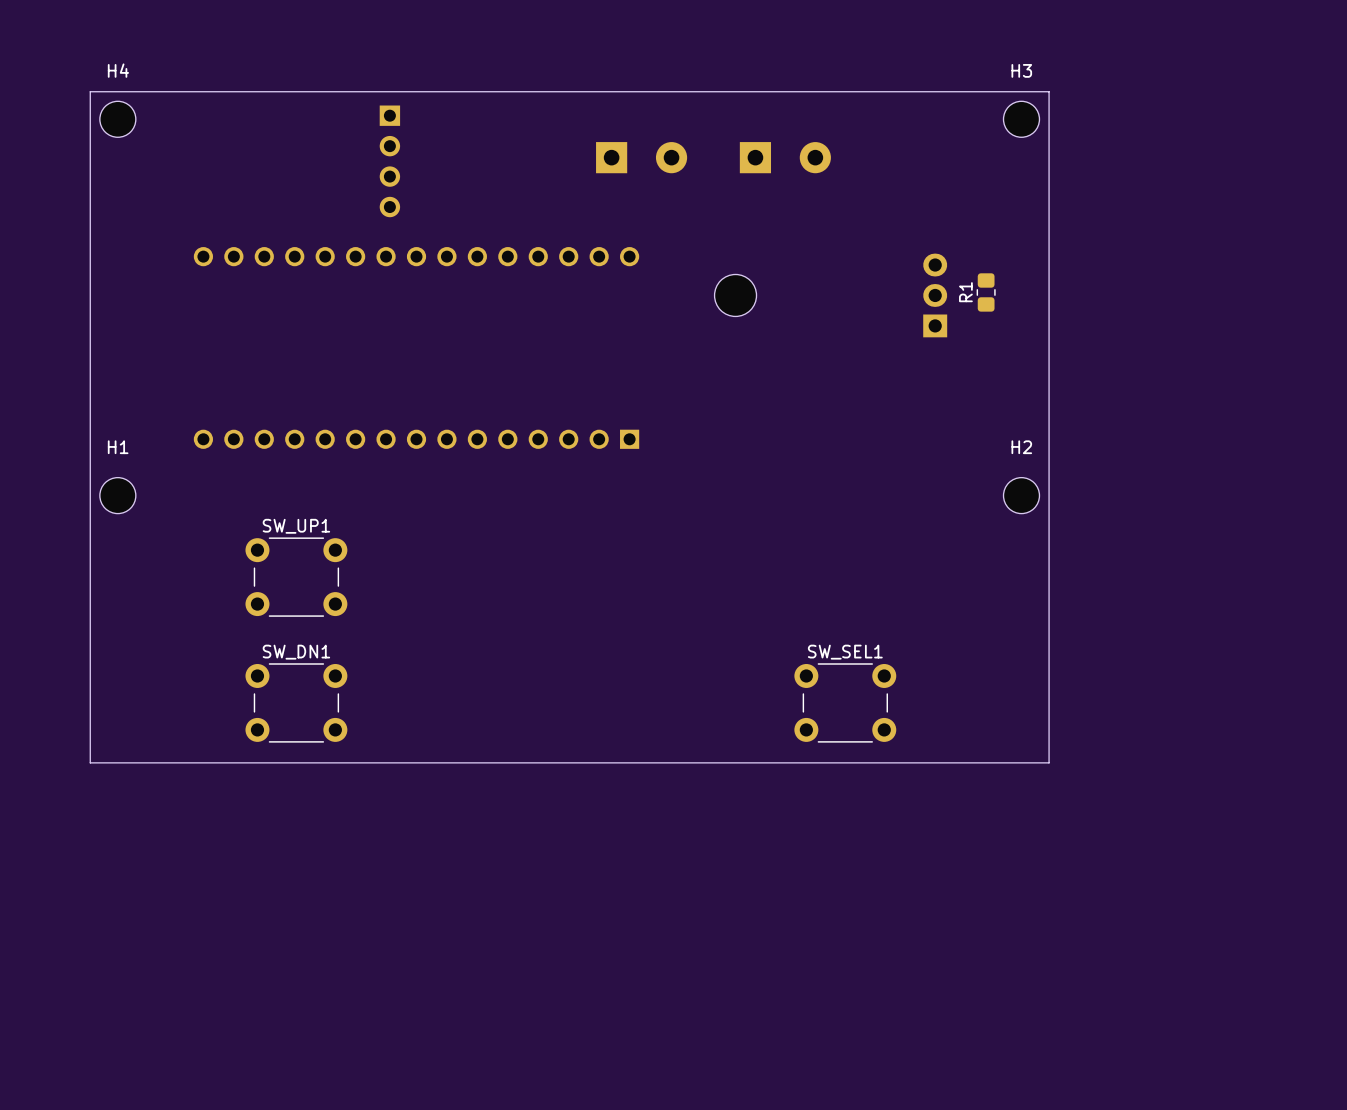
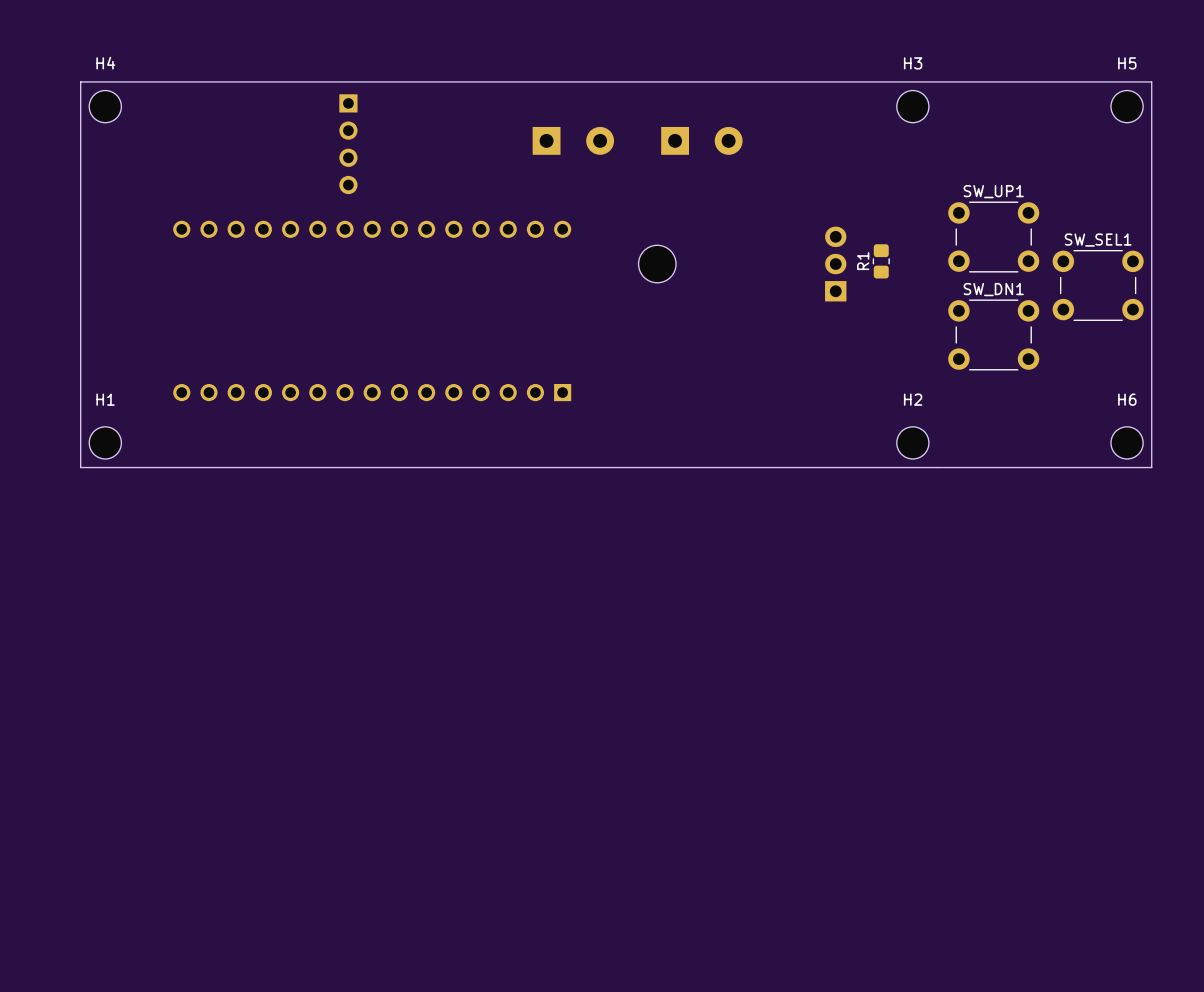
board edge: (1049, 91) (1049, 762) (90, 762) (90, 523) -> (937, 81) (1151, 81) (1151, 467) (80, 467)
H5: none -> (1127, 106)
H6: none -> (1127, 442)
SW_UP1 position: (296, 577) -> (993, 237)
SW_DN1 position: (296, 702) -> (993, 334)
SW_SEL1 position: (845, 702) -> (1098, 285)

